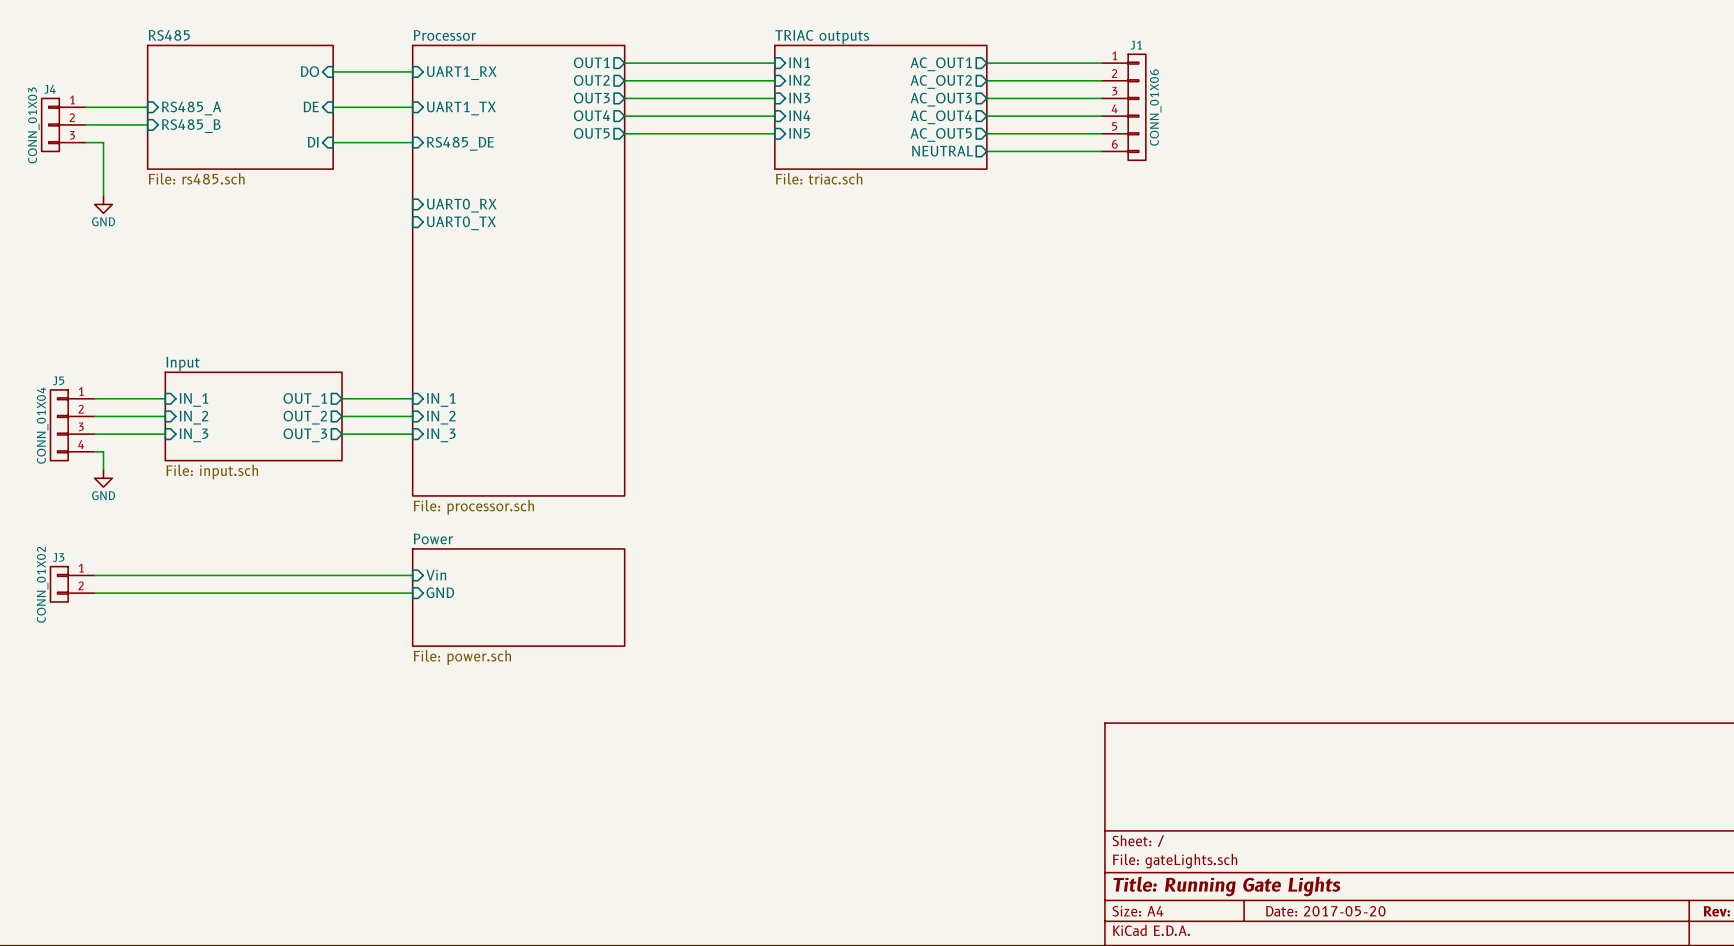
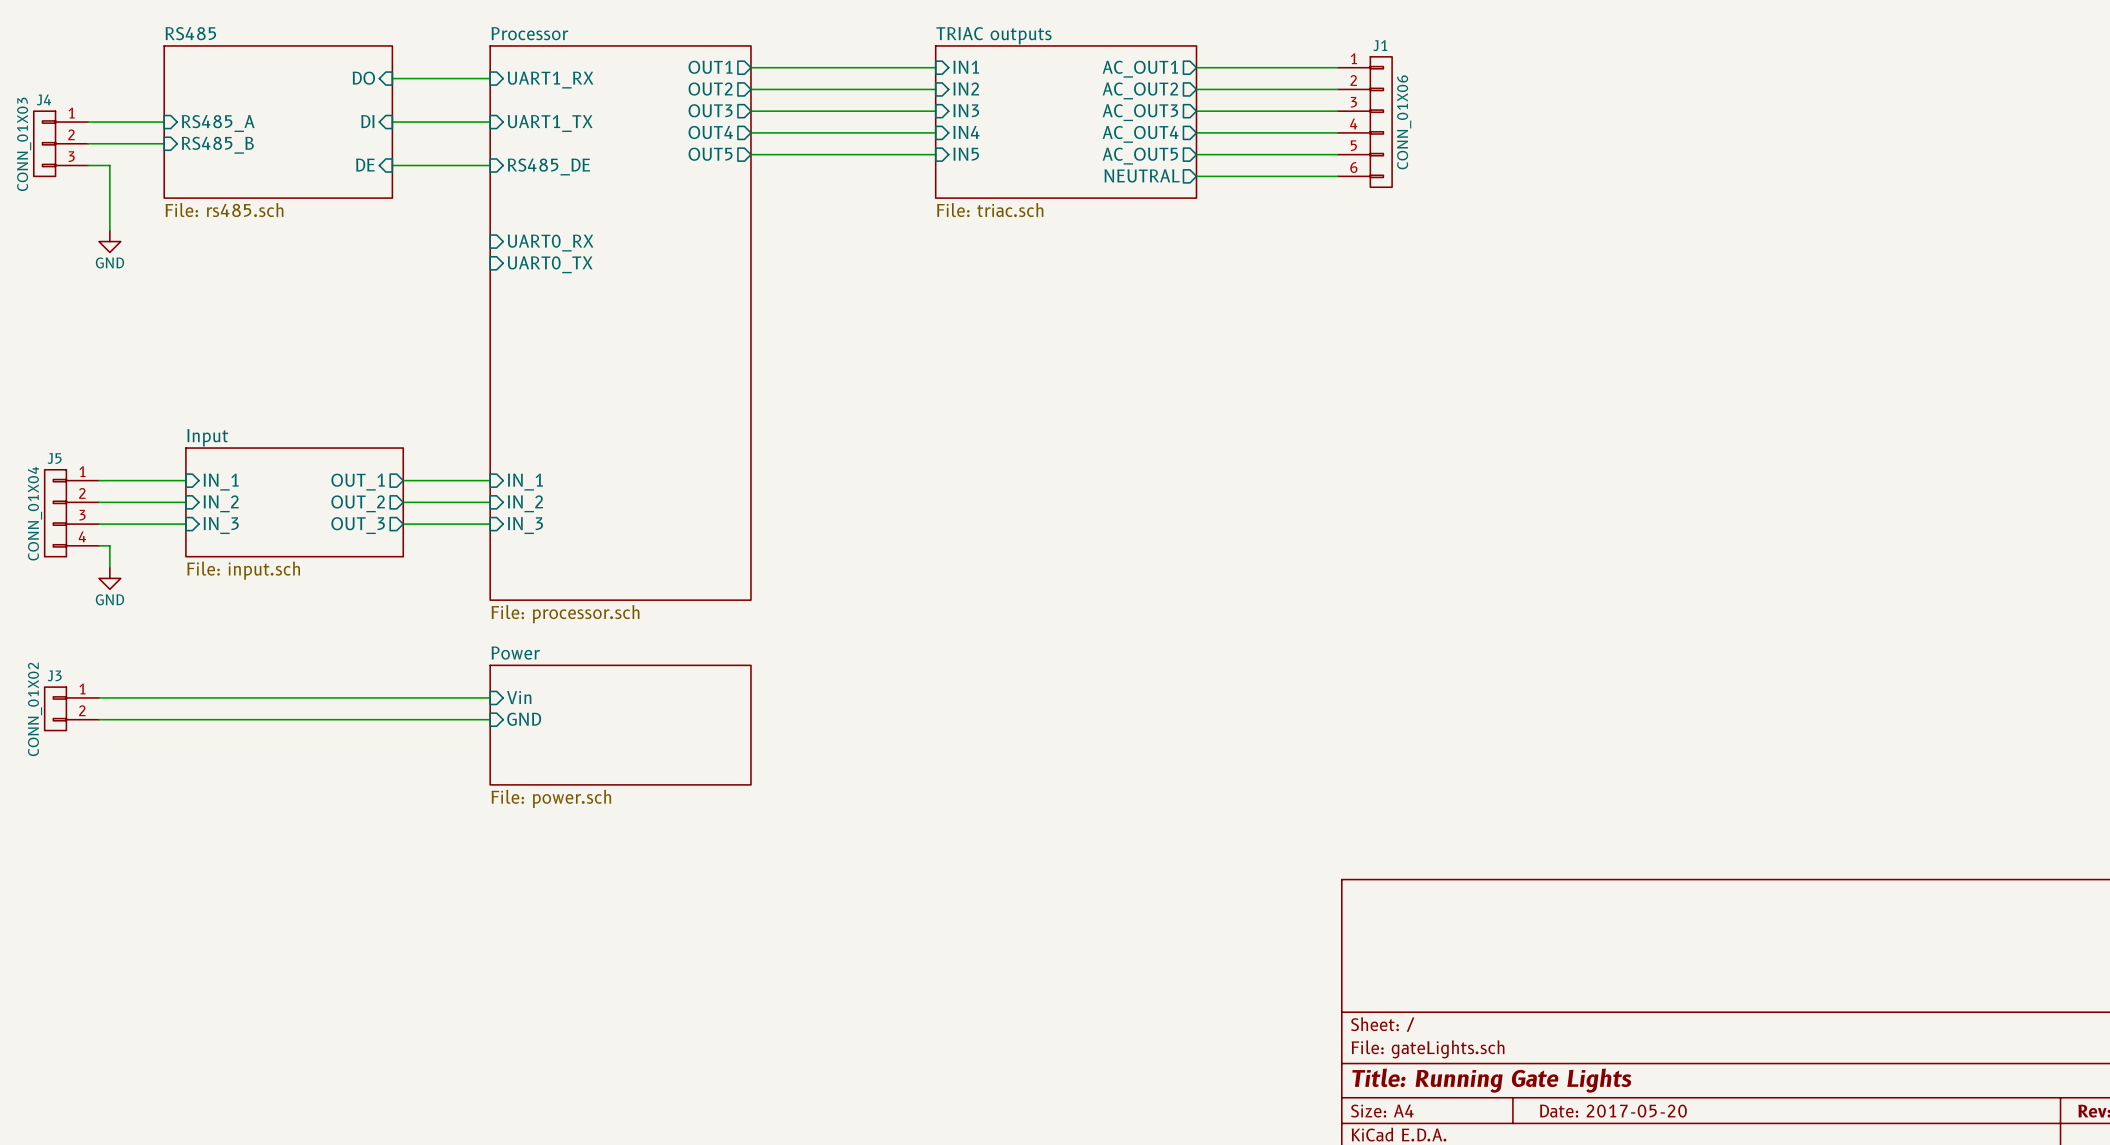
sheet pin: DE (311, 106) -> DI (367, 121)
sheet pin: DI (313, 142) -> DE (365, 165)

